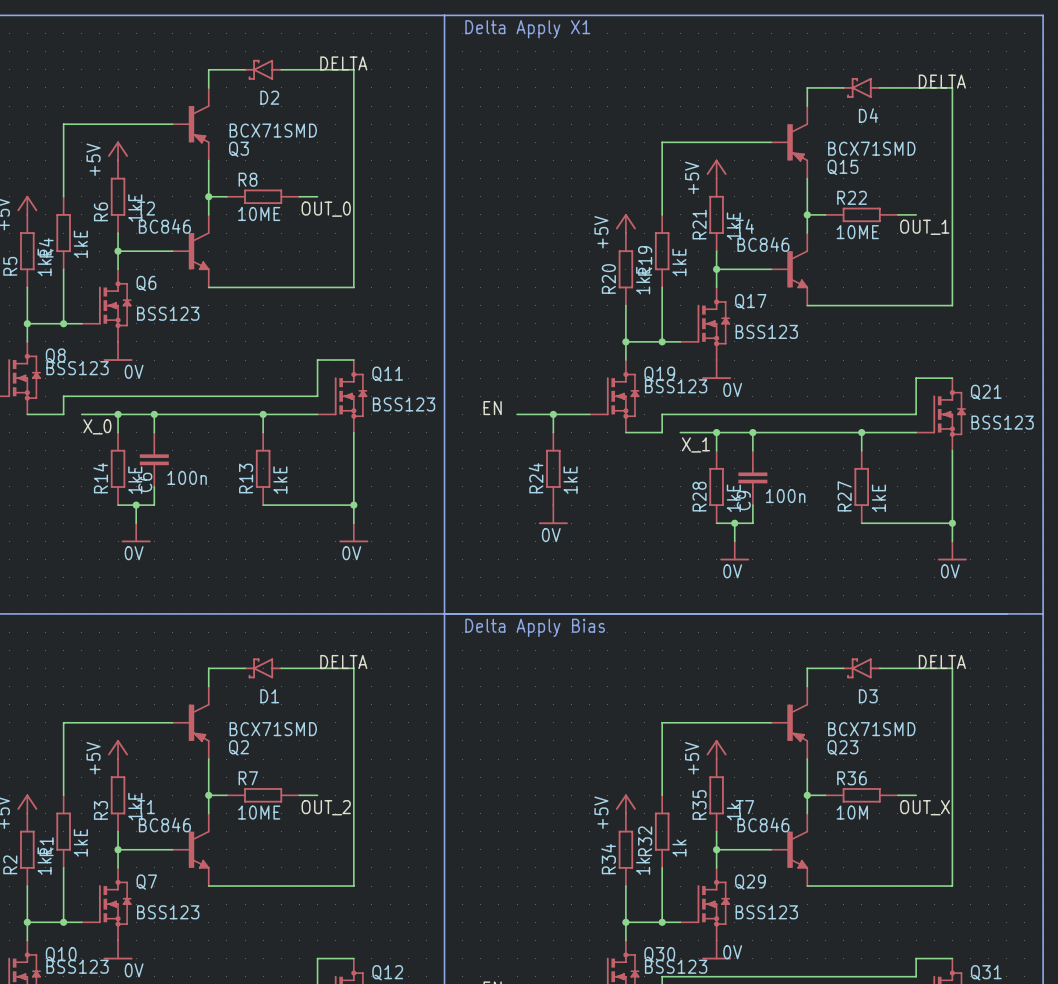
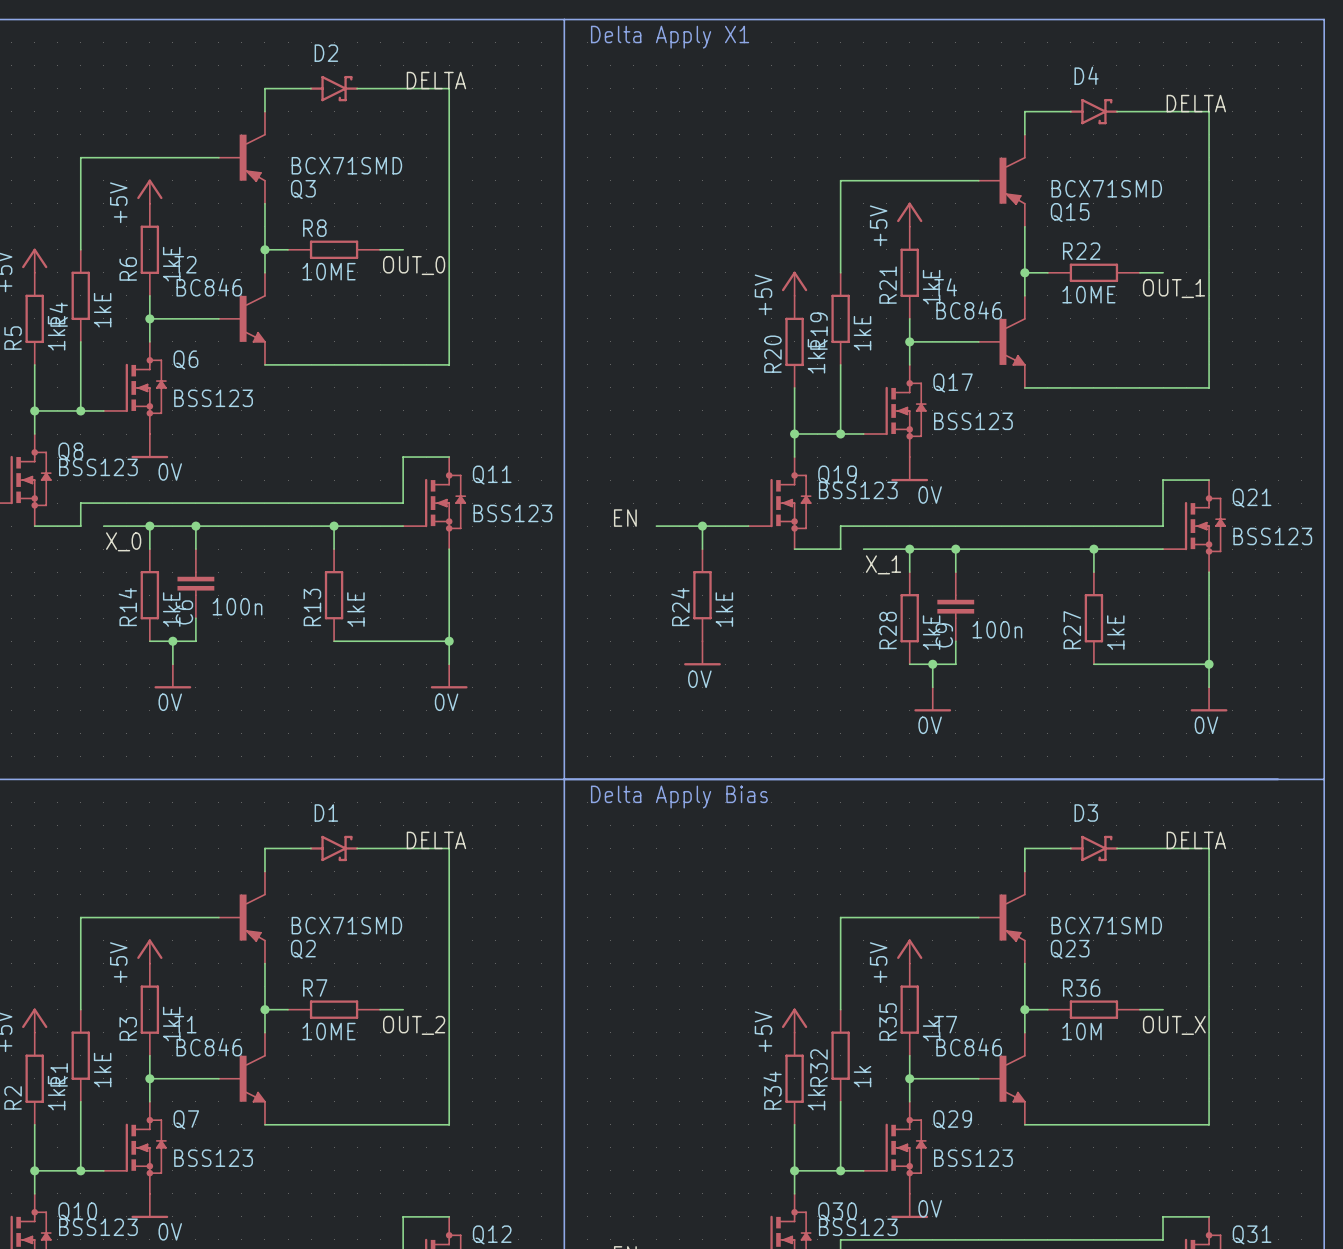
D2 rotation: 0° (263, 69) -> 180° (334, 88)
D4 rotation: 0° (861, 87) -> 180° (1093, 111)
D1 rotation: 0° (263, 668) -> 180° (334, 848)
D3 rotation: 0° (861, 668) -> 180° (1093, 848)

